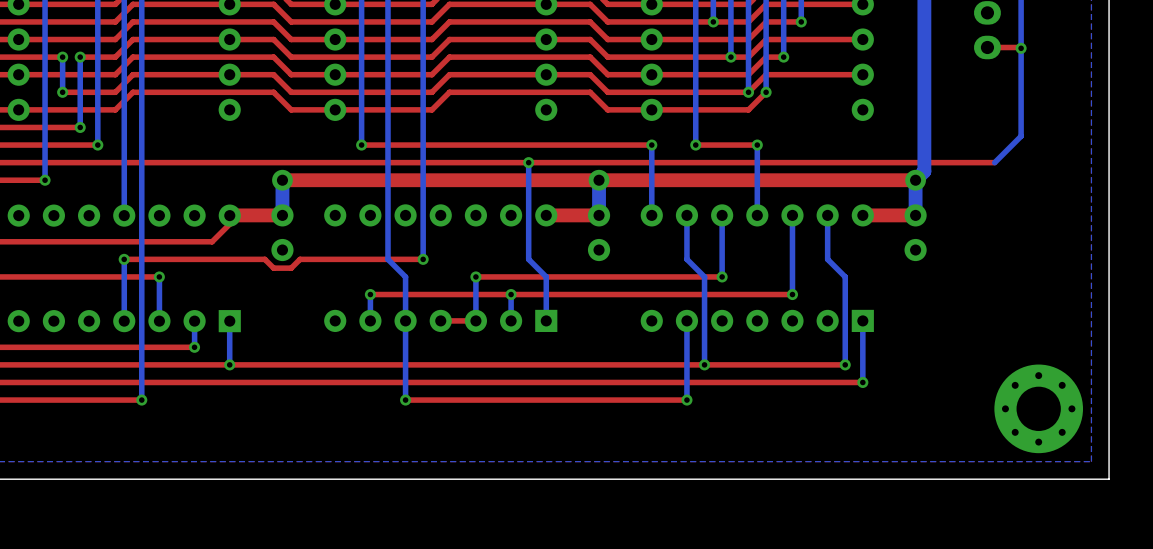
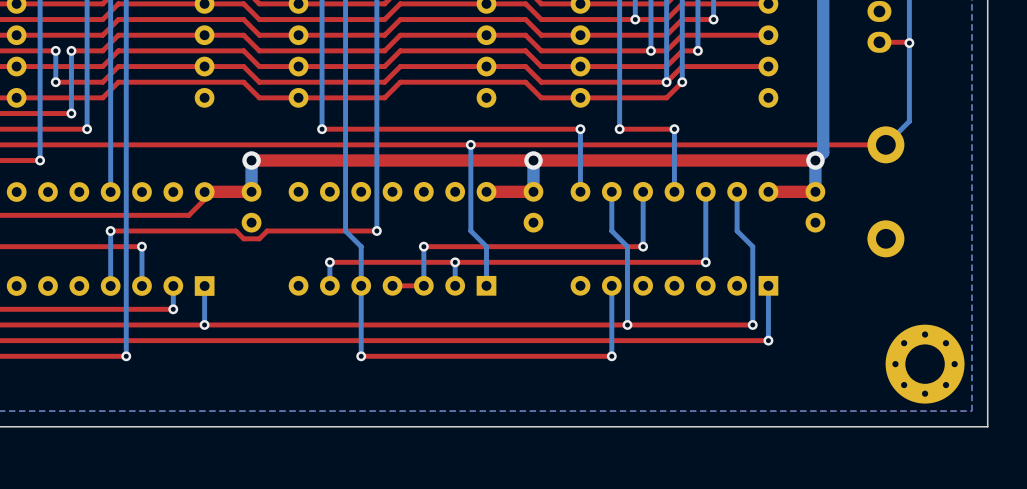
part: none -> (885, 144)
part: none -> (885, 238)

